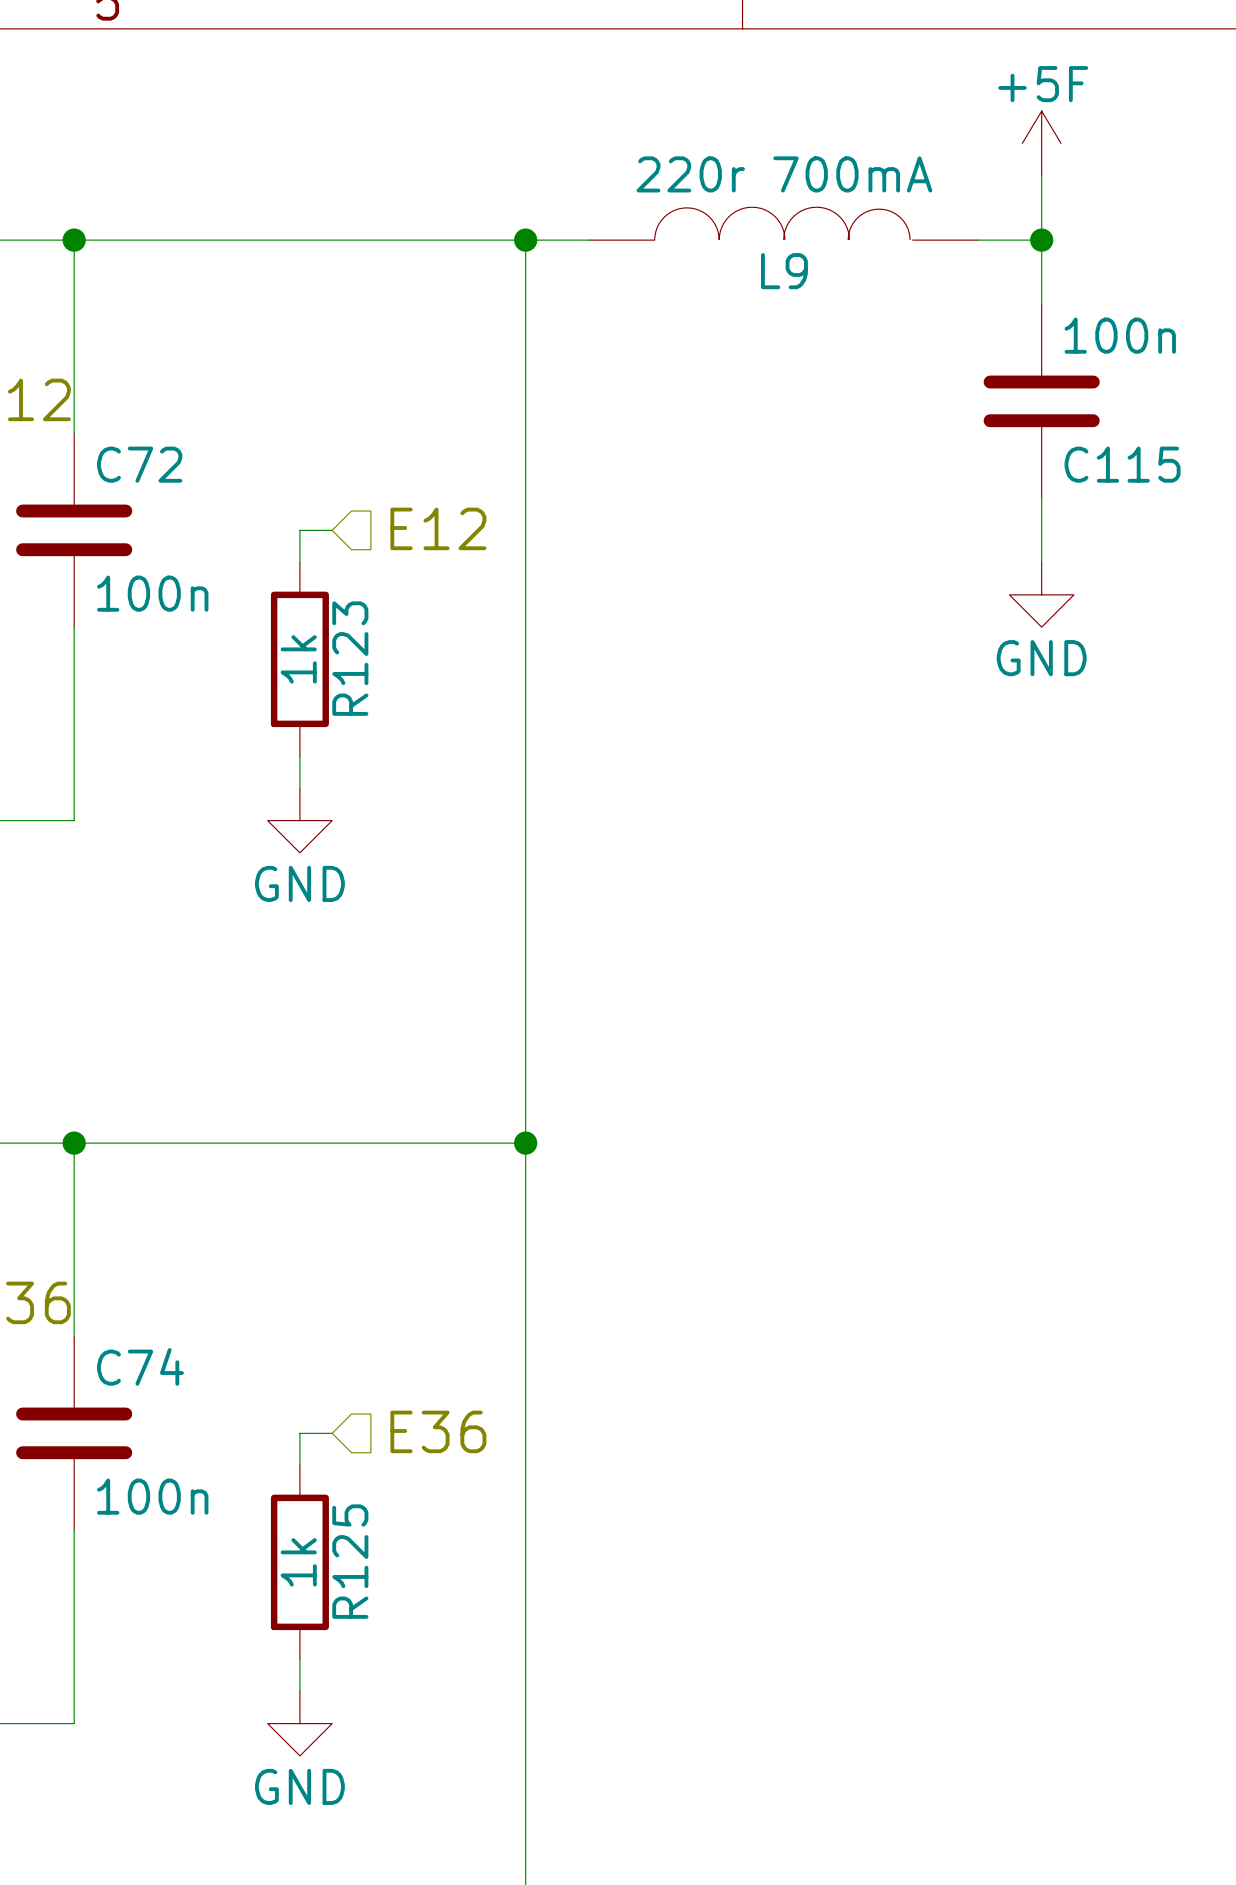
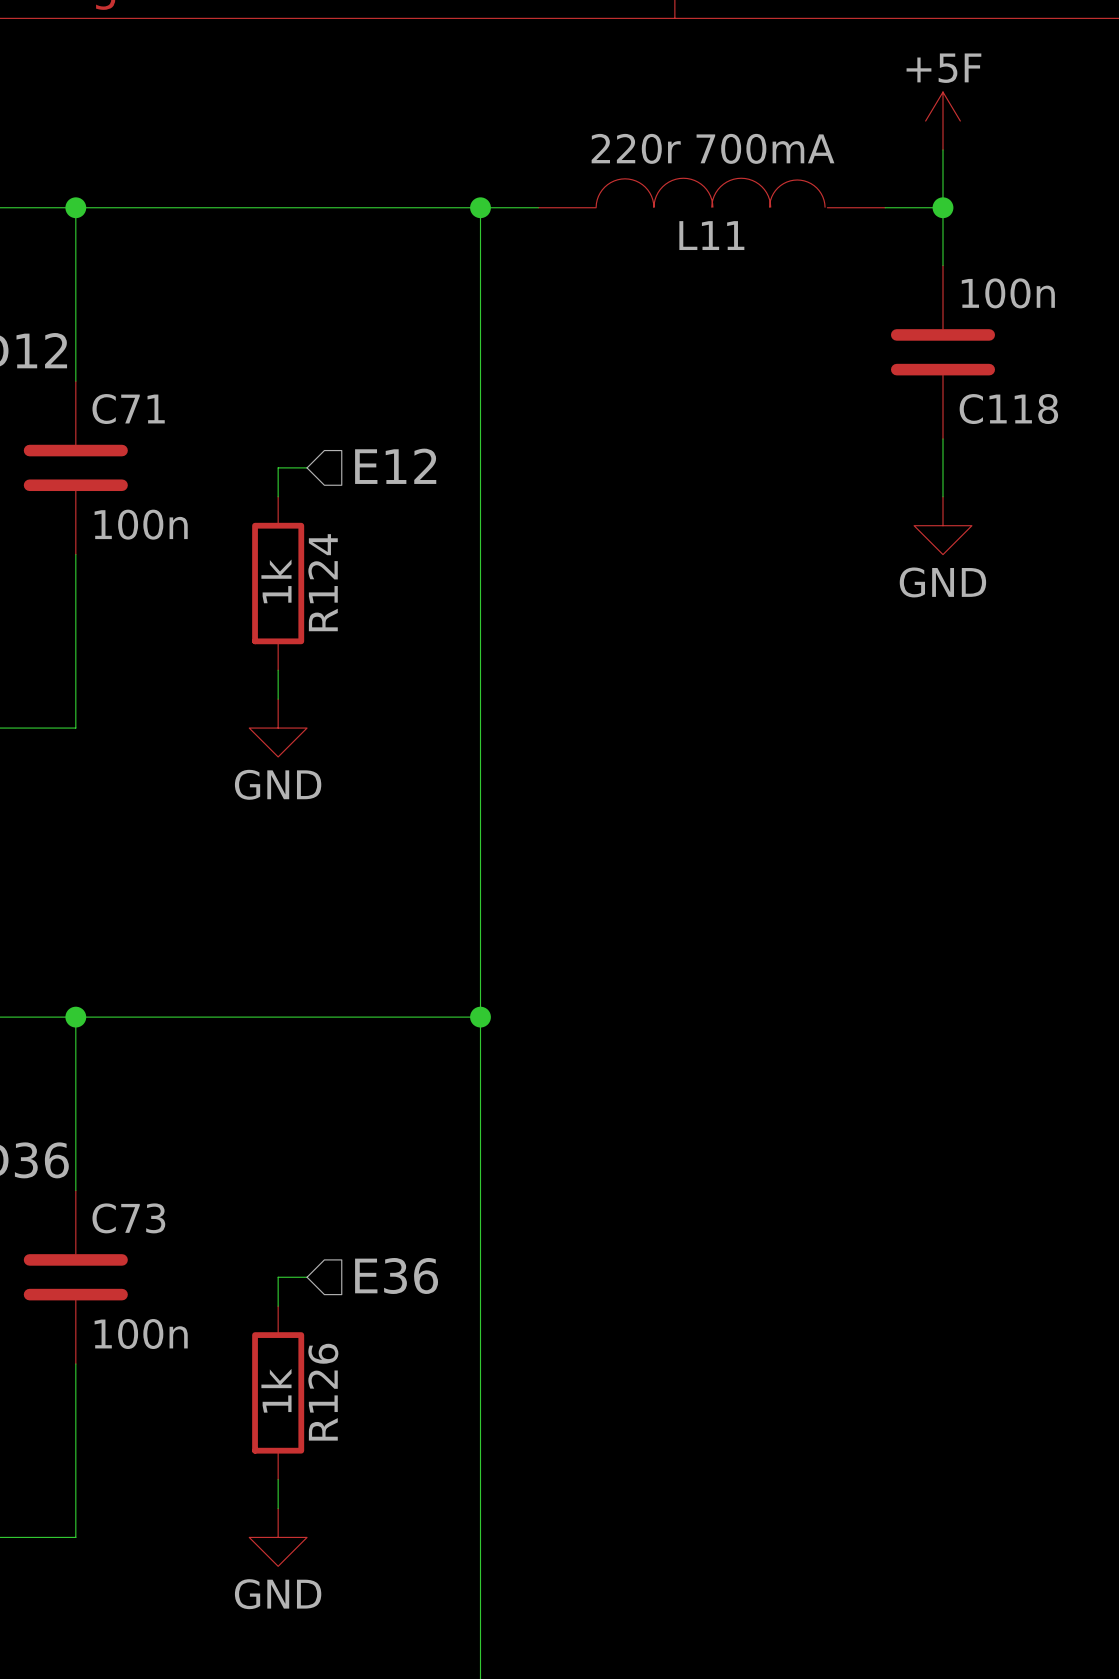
L9 name: L9 (784, 271) -> L11 (711, 235)
C72 name: C72 (139, 464) -> C71 (128, 409)
C115 name: C115 (1122, 464) -> C118 (1008, 409)
R123 name: R123 (350, 658) -> R124 (323, 582)
C74 name: C74 (140, 1366) -> C73 (128, 1218)
R125 name: R125 (350, 1561) -> R126 (323, 1392)

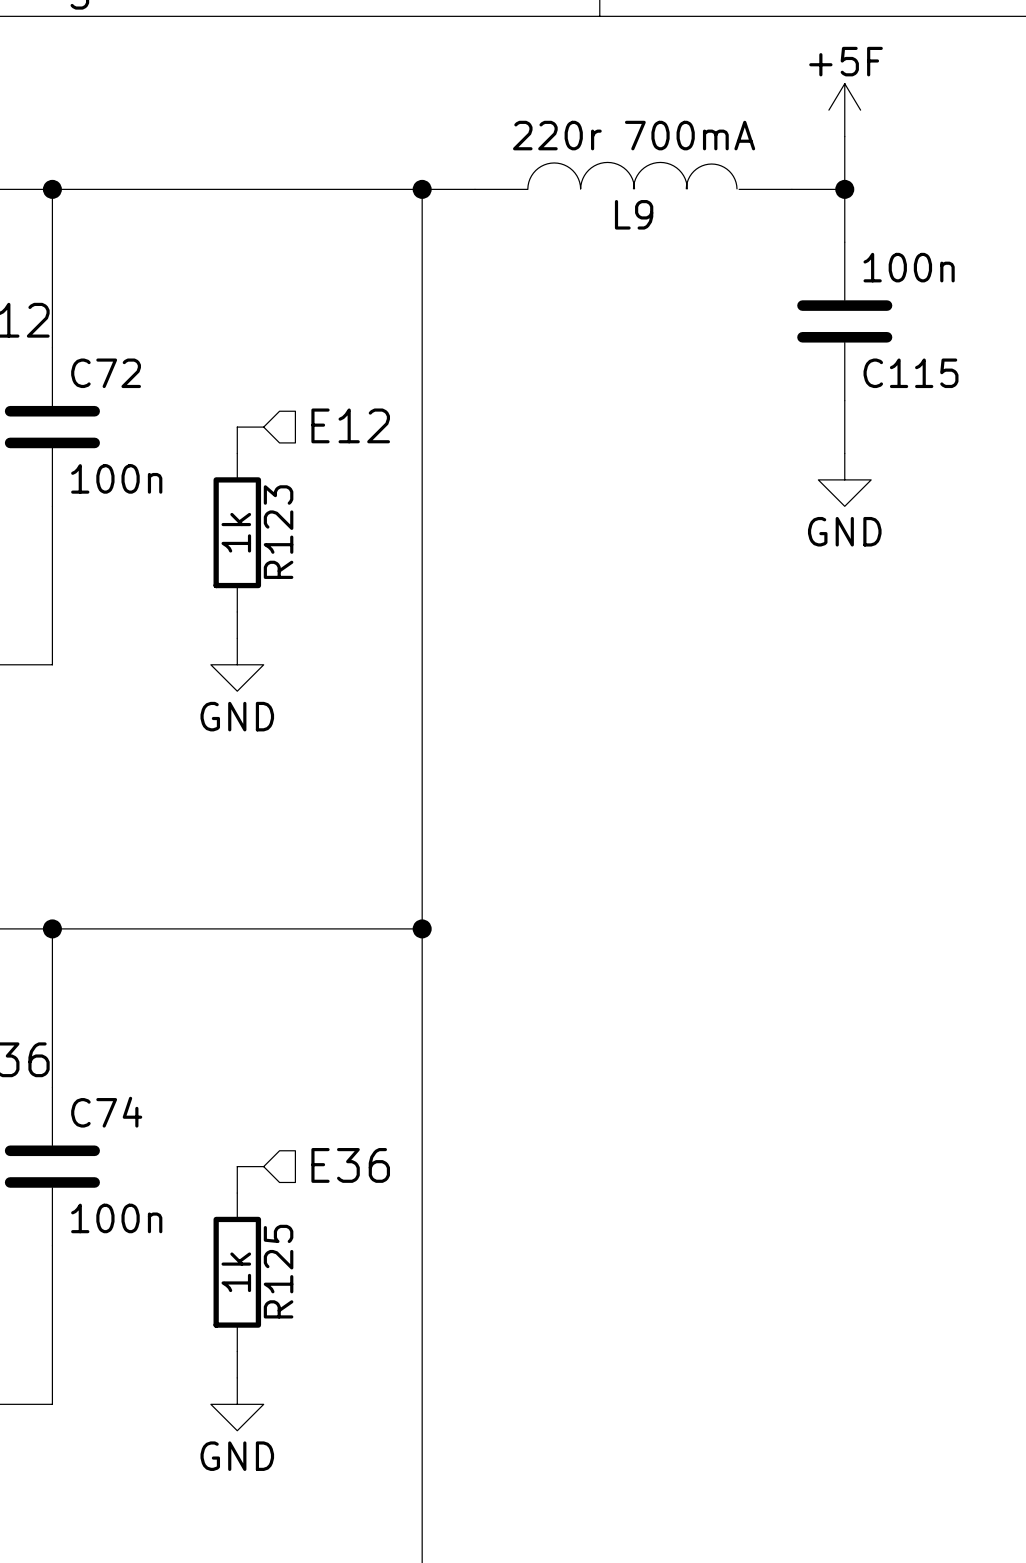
L11 name: L11 (711, 235) -> L9 (634, 214)
C71 name: C71 (128, 409) -> C72 (106, 373)
C118 name: C118 (1008, 409) -> C115 (911, 373)
R124 name: R124 (323, 582) -> R123 (278, 532)
C73 name: C73 (128, 1218) -> C74 (106, 1112)
R126 name: R126 (323, 1392) -> R125 (278, 1271)

